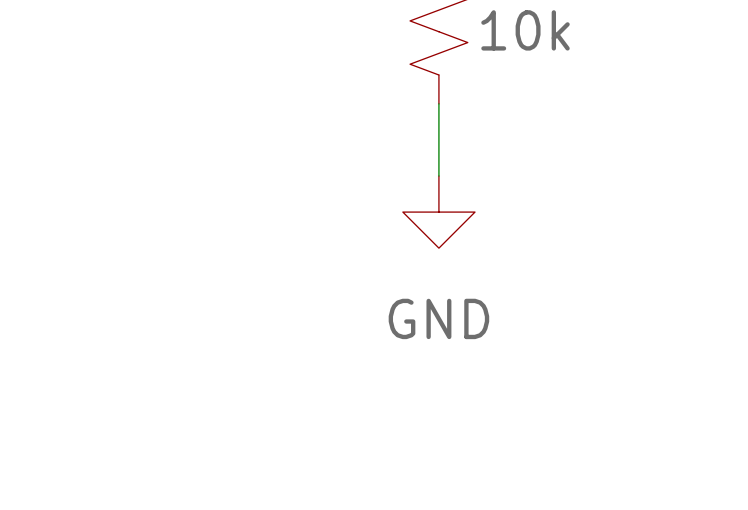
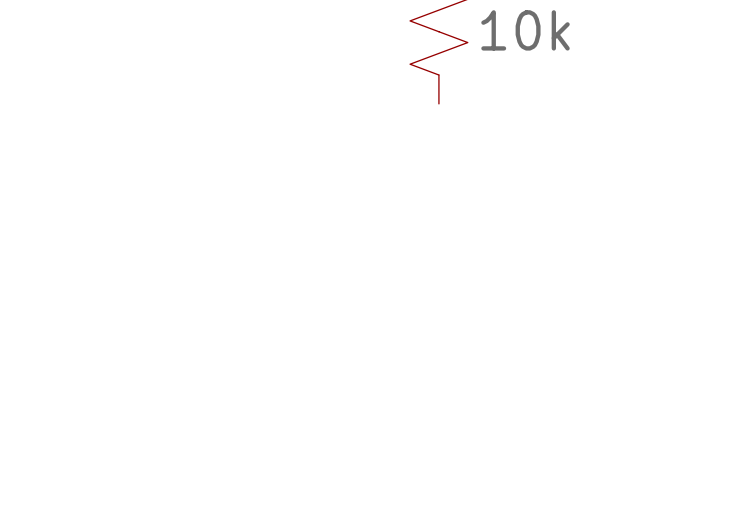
wire: (438, 103) (438, 176) -> none
power symbol: GND (438, 212) -> none

